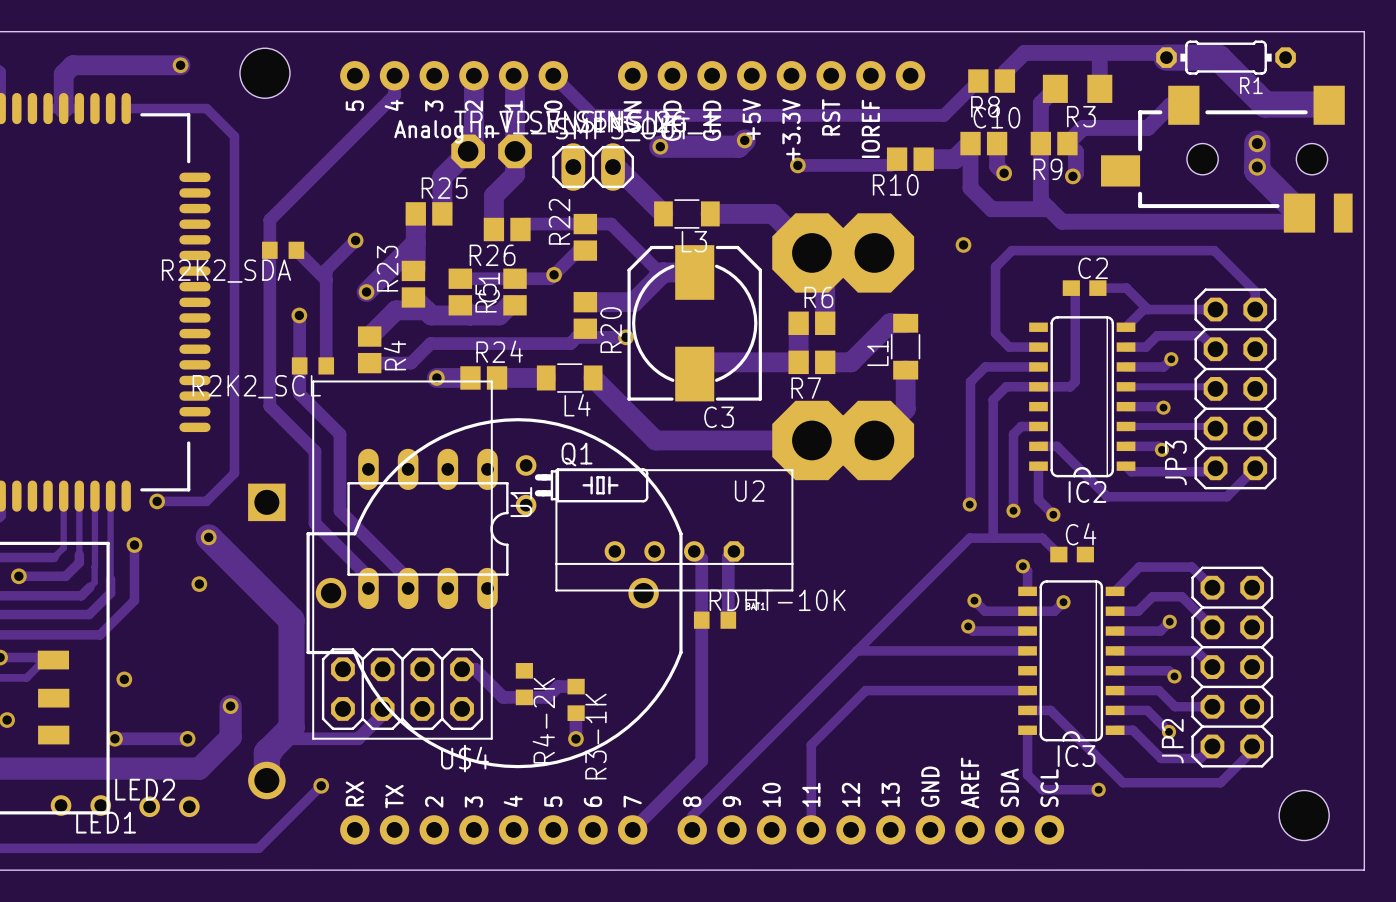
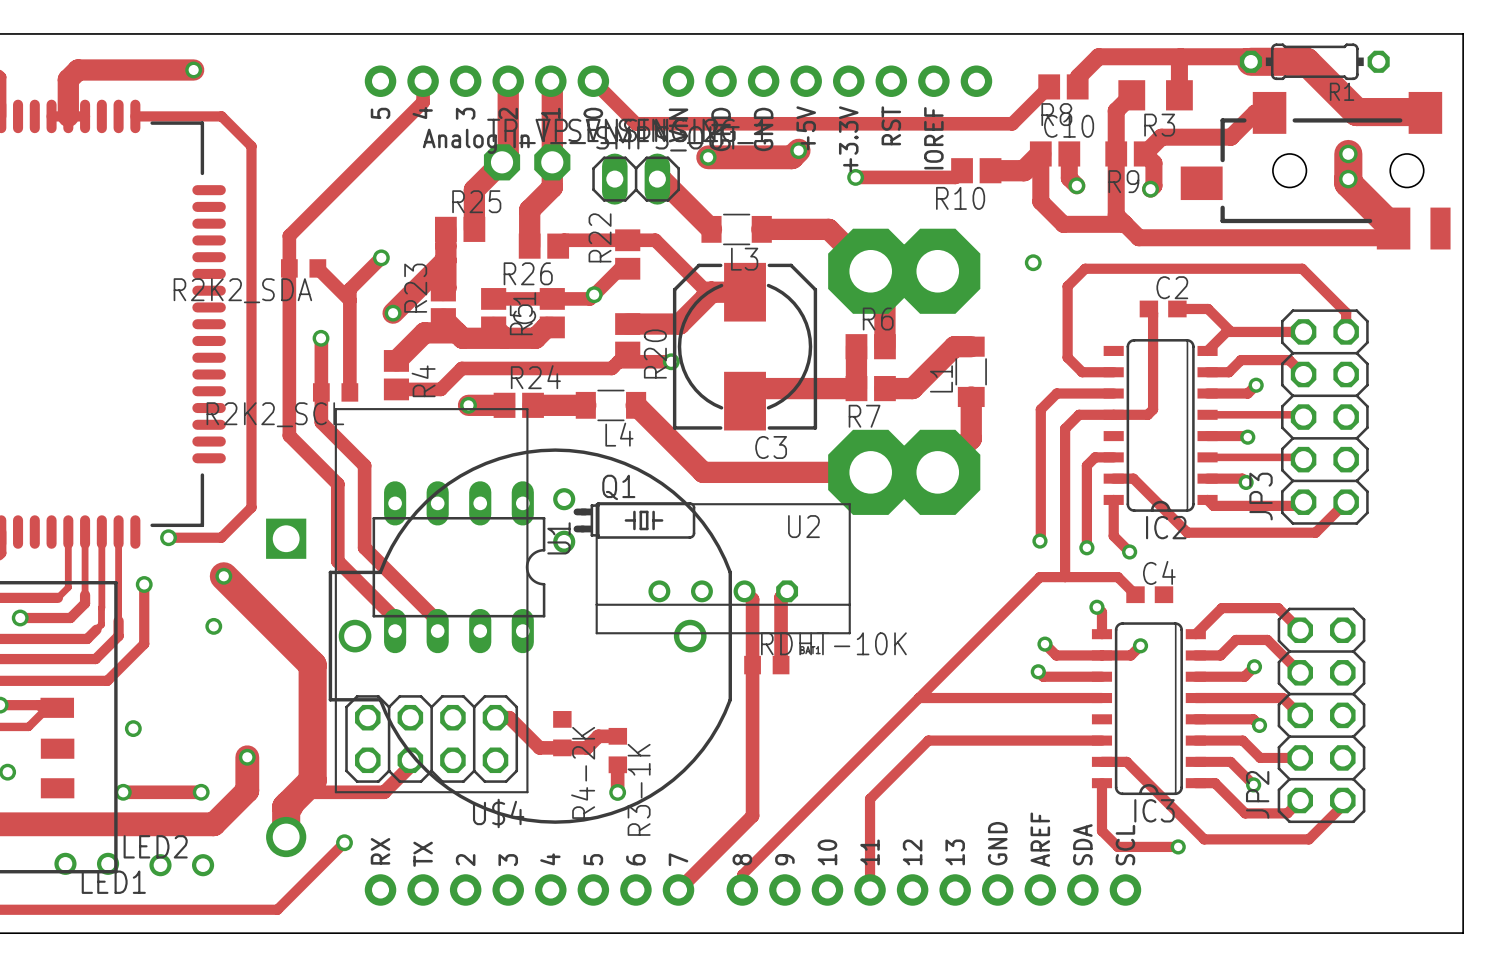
hole: (264, 73) -> none
hole: (1304, 815) -> none

